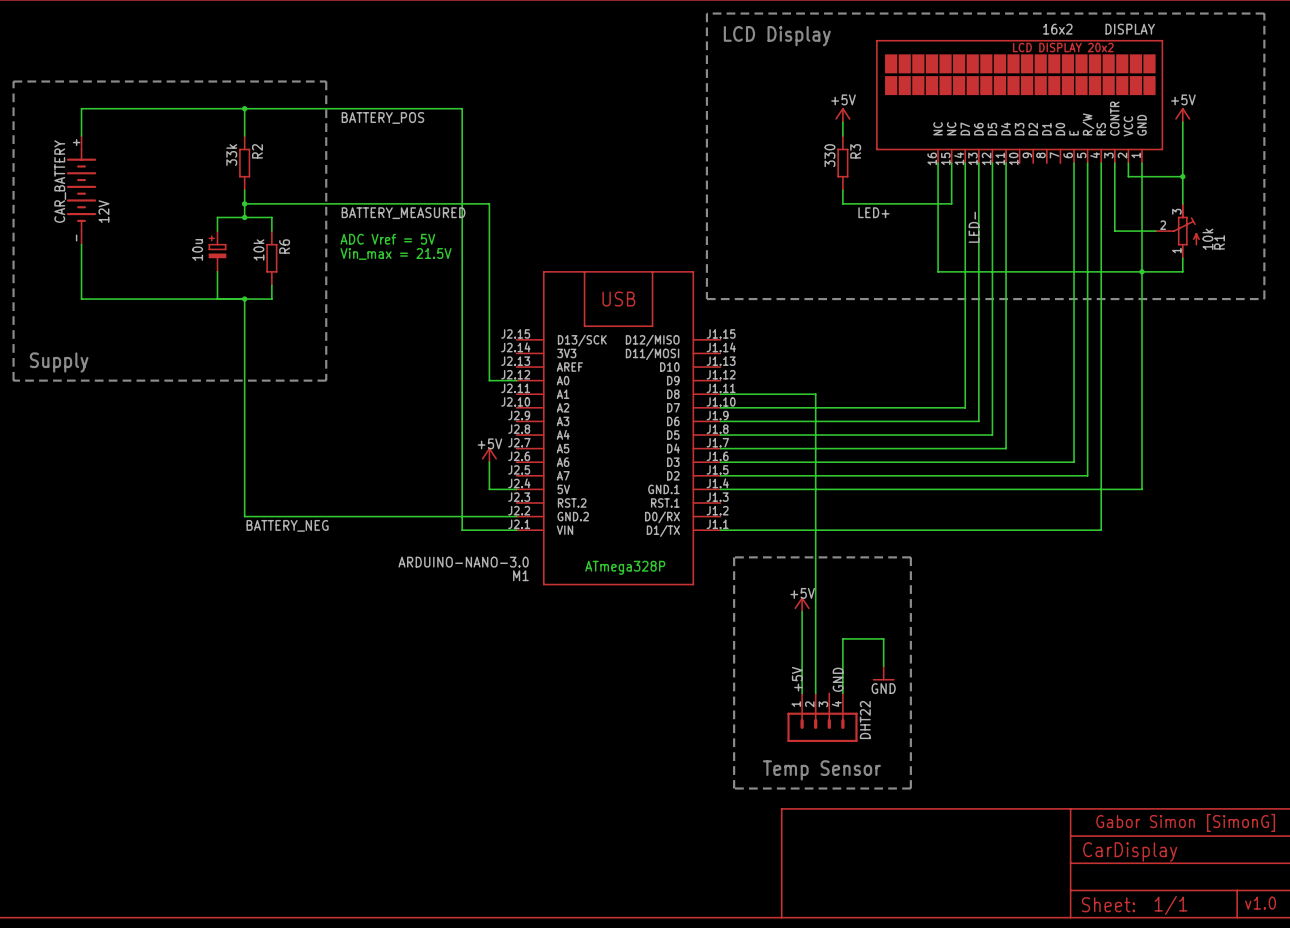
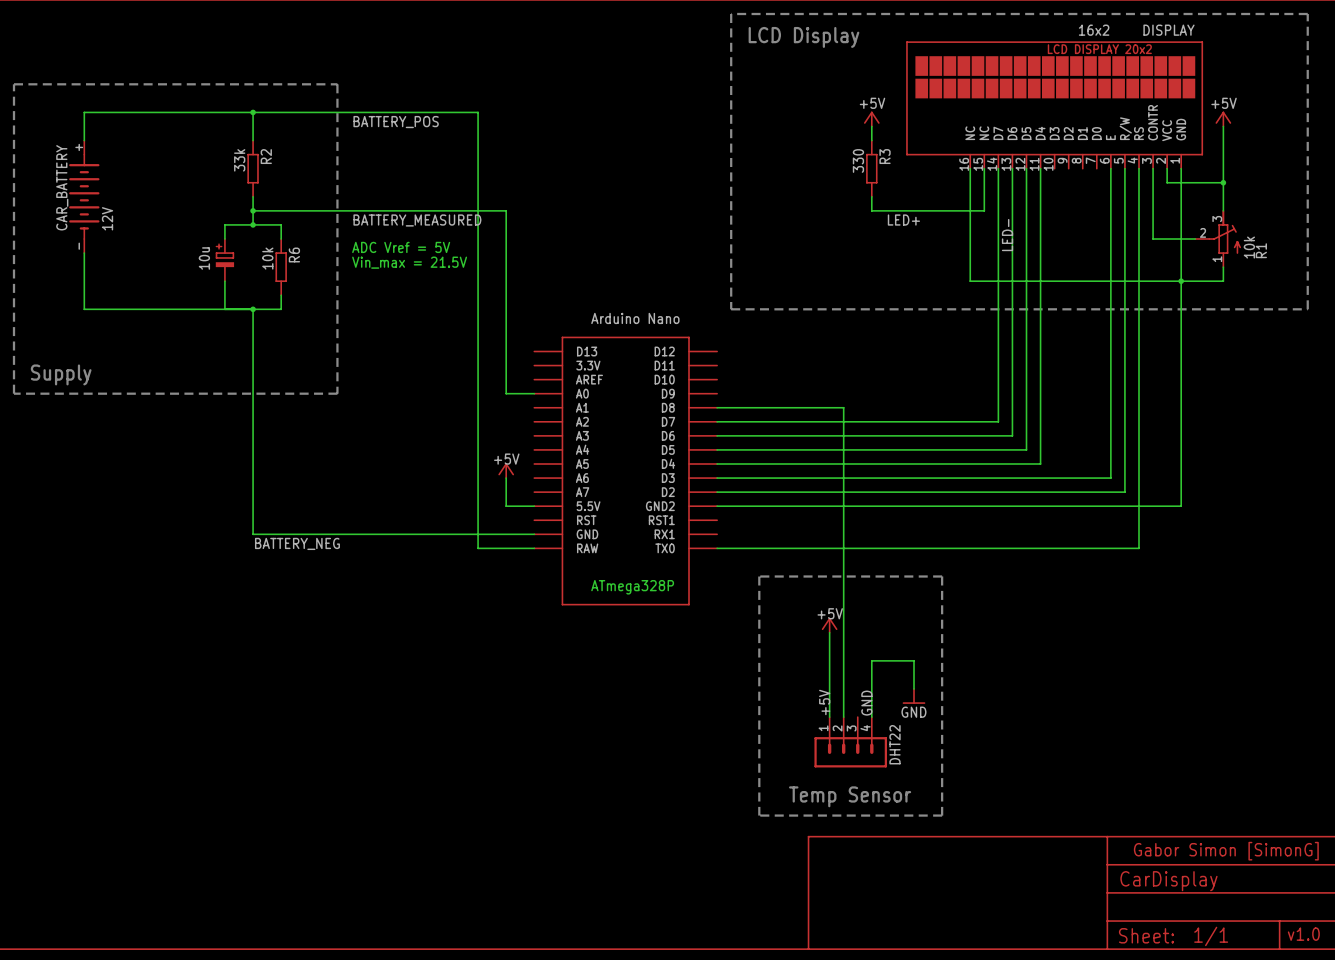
M1: ARDUINO-NANO-3.0 (618, 428) -> none
part: none -> (625, 471)
text position: ATmega328P (625, 567) -> ATmega328P (632, 587)

